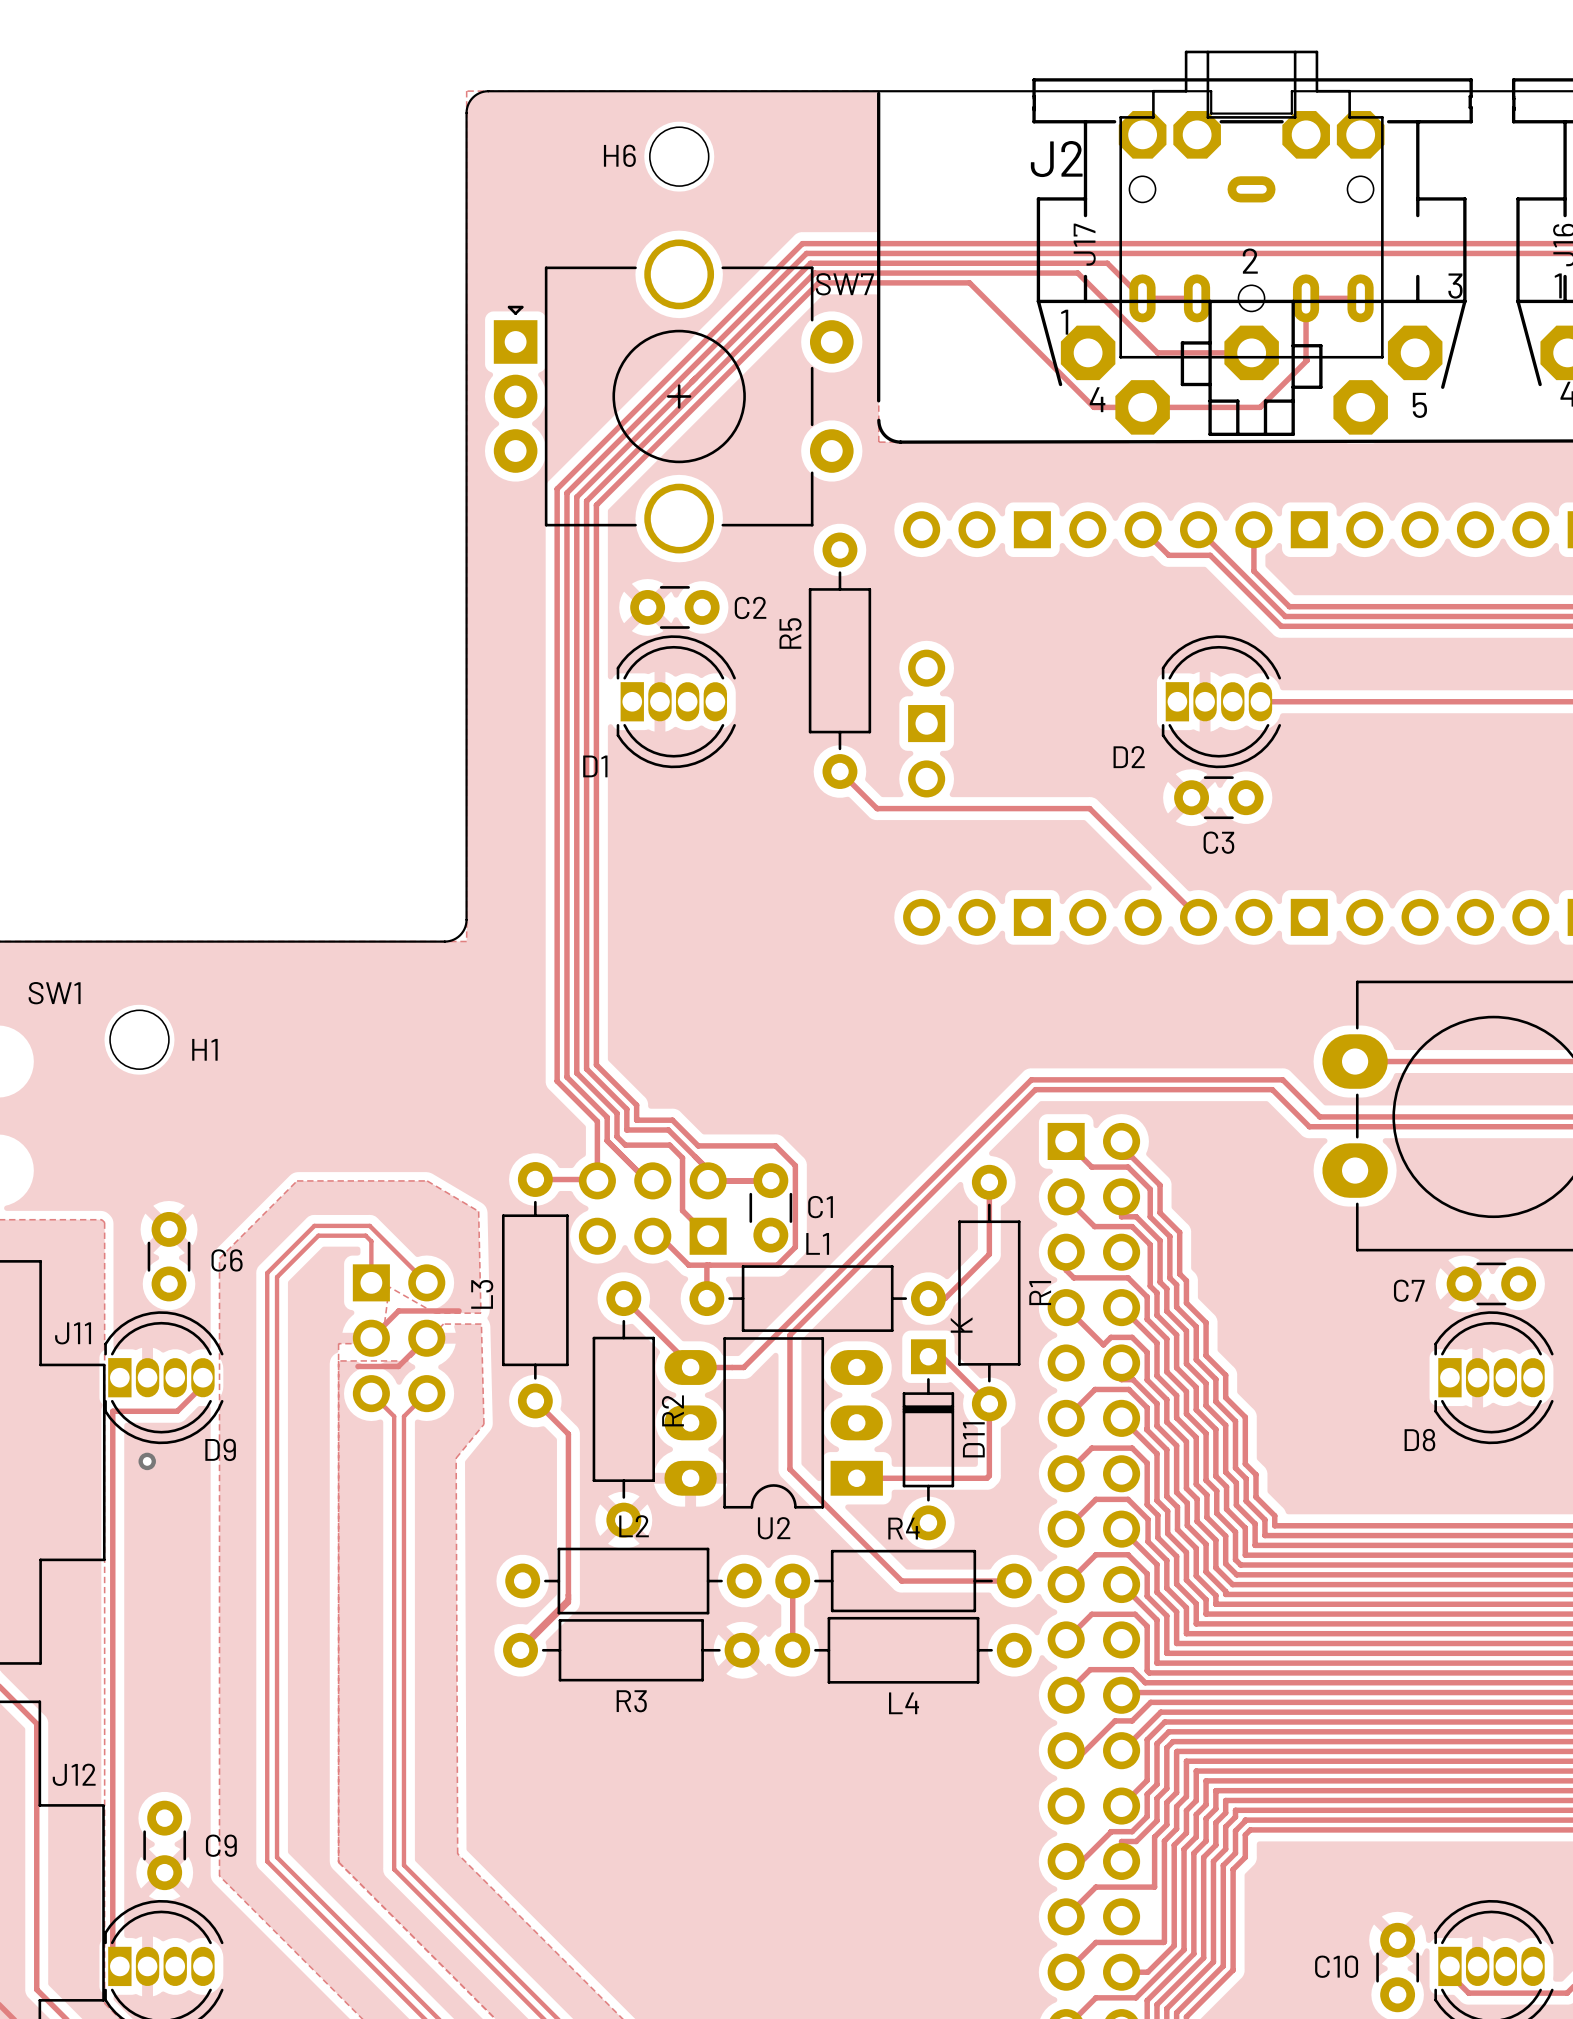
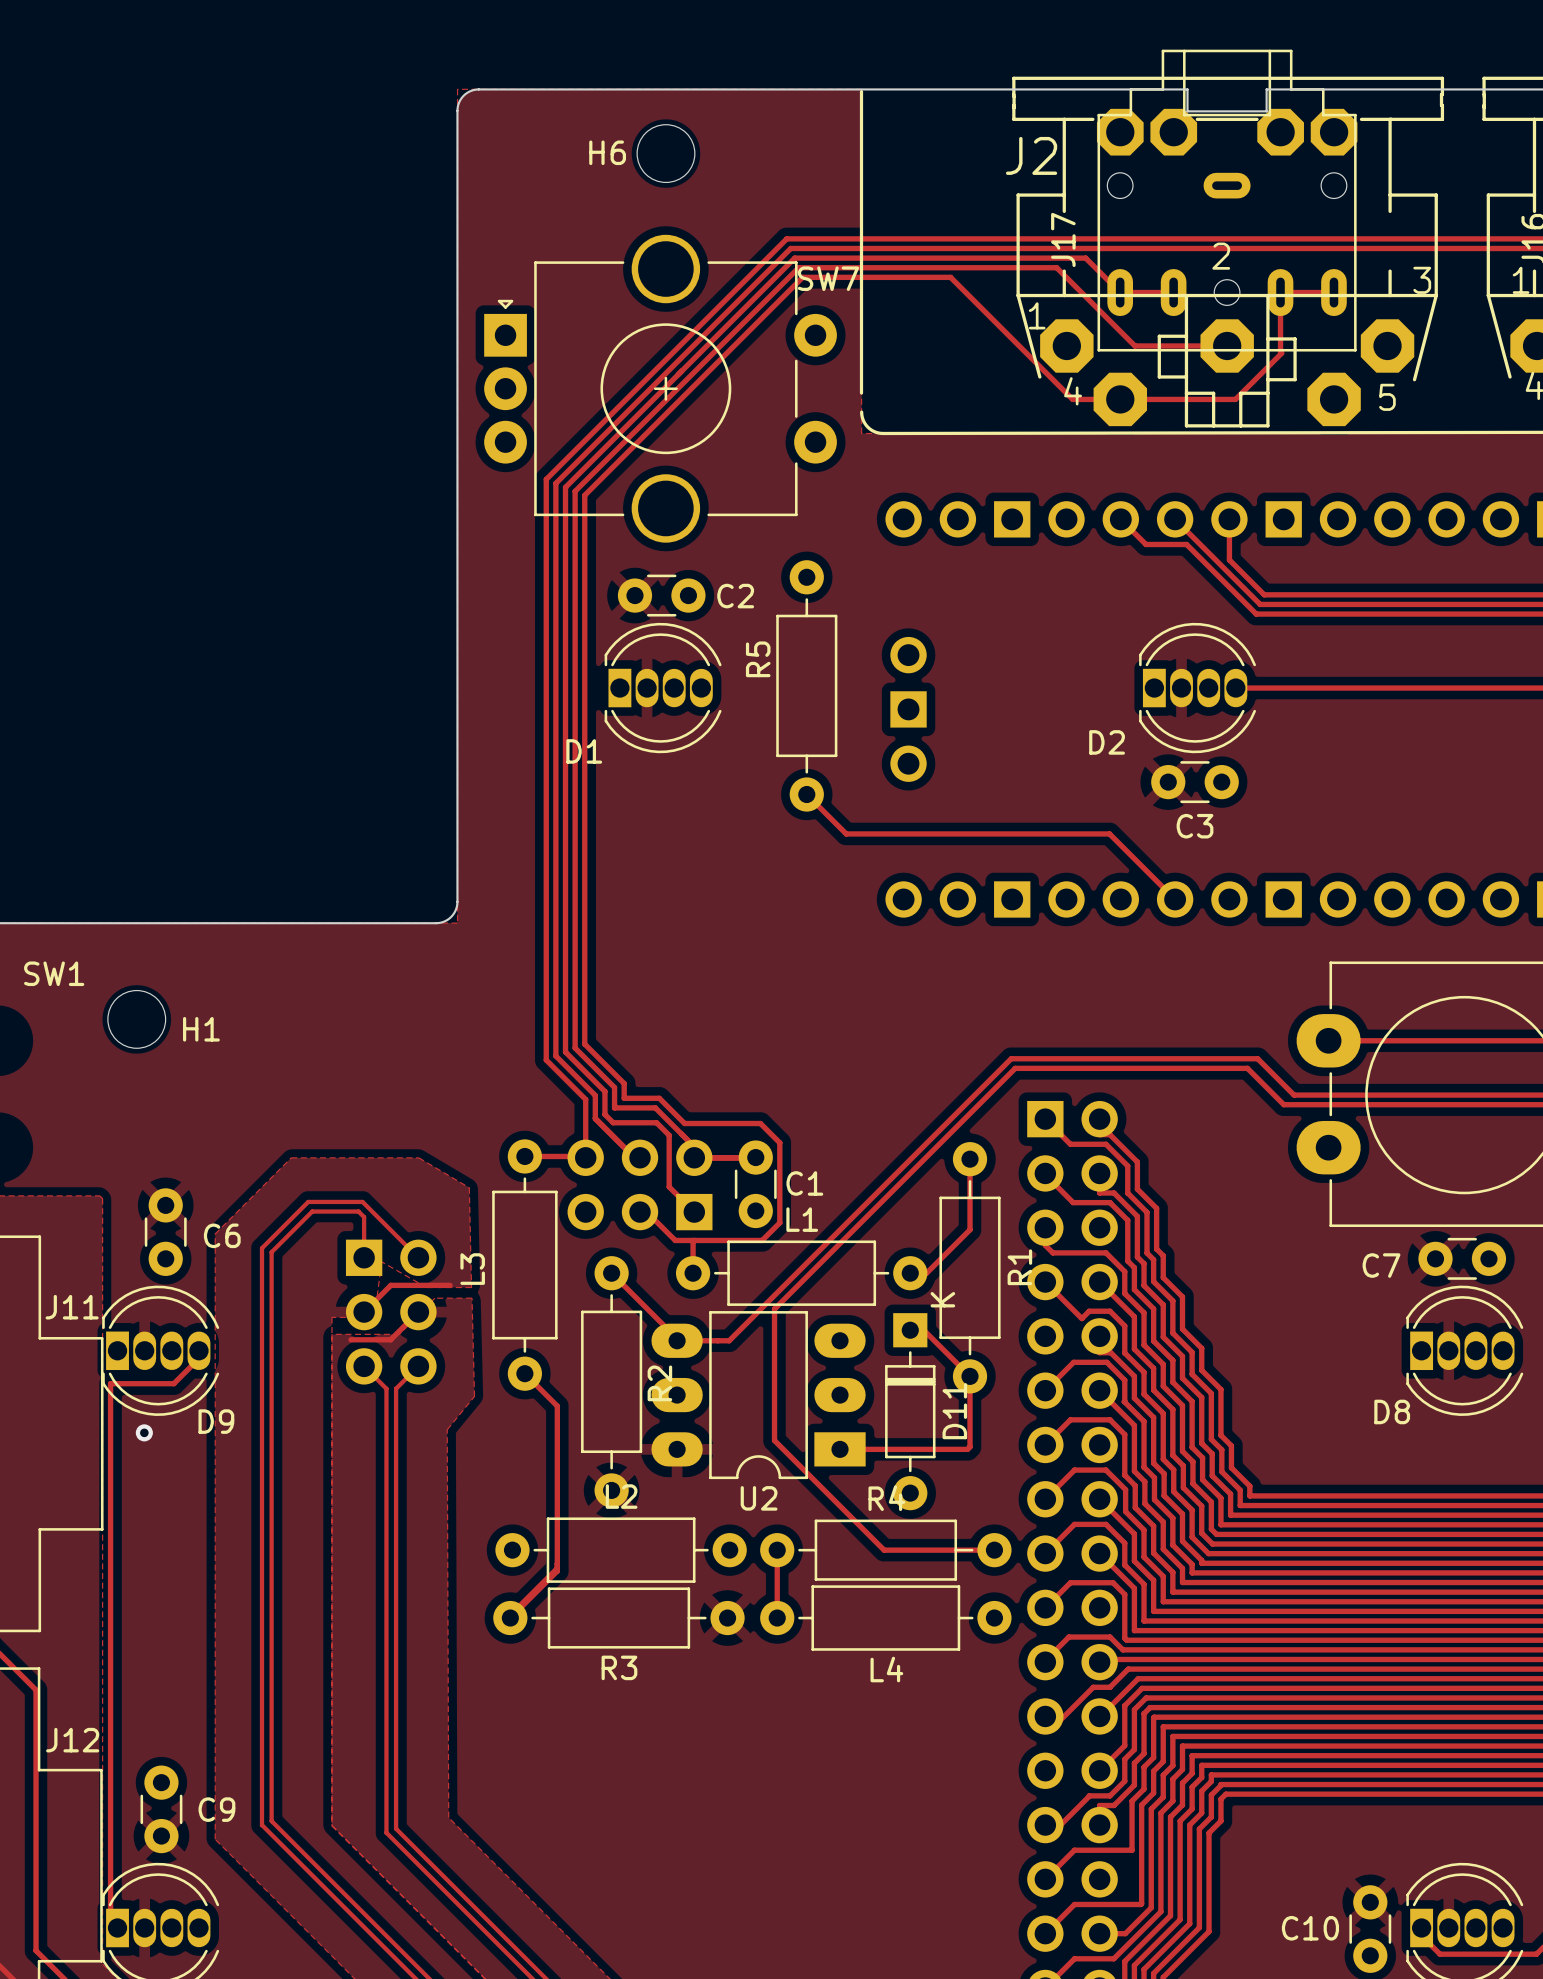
R5 position: (839, 660) -> (806, 685)
track: (839, 771) (877, 808) (1089, 808) (1131, 850) -> (806, 794) (846, 833) (1109, 833)

